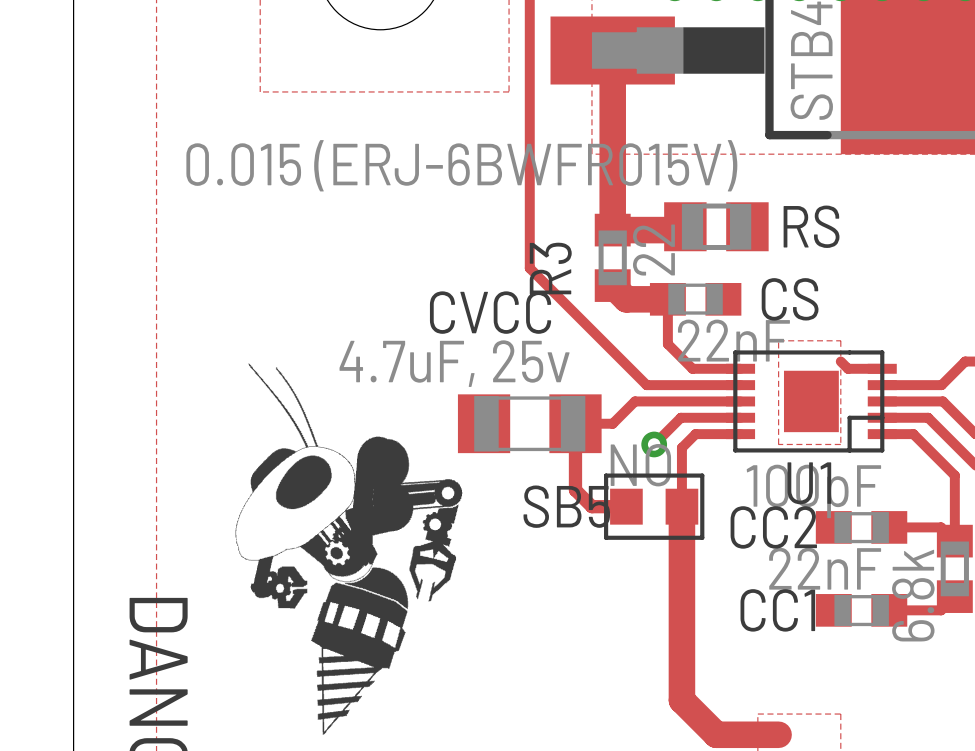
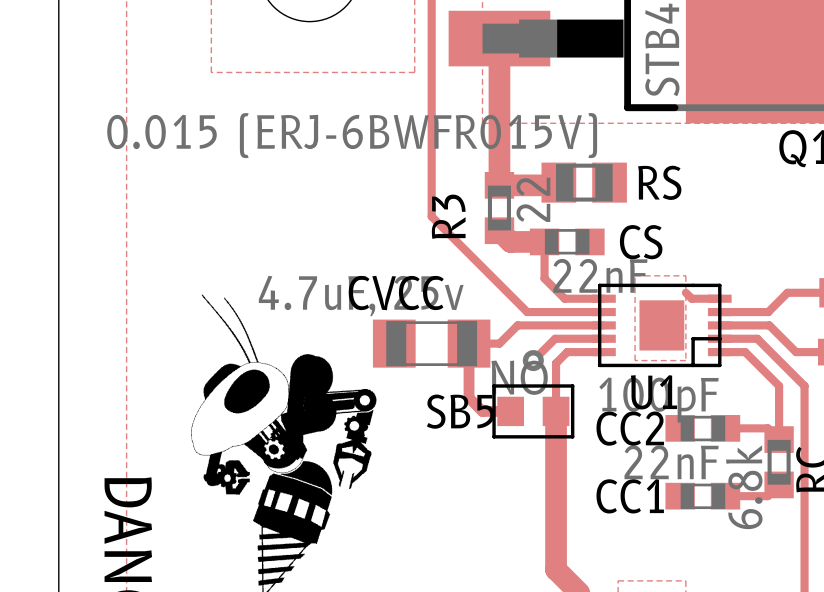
CVCC name position: CVCC (490, 312) -> CVCC (396, 293)

